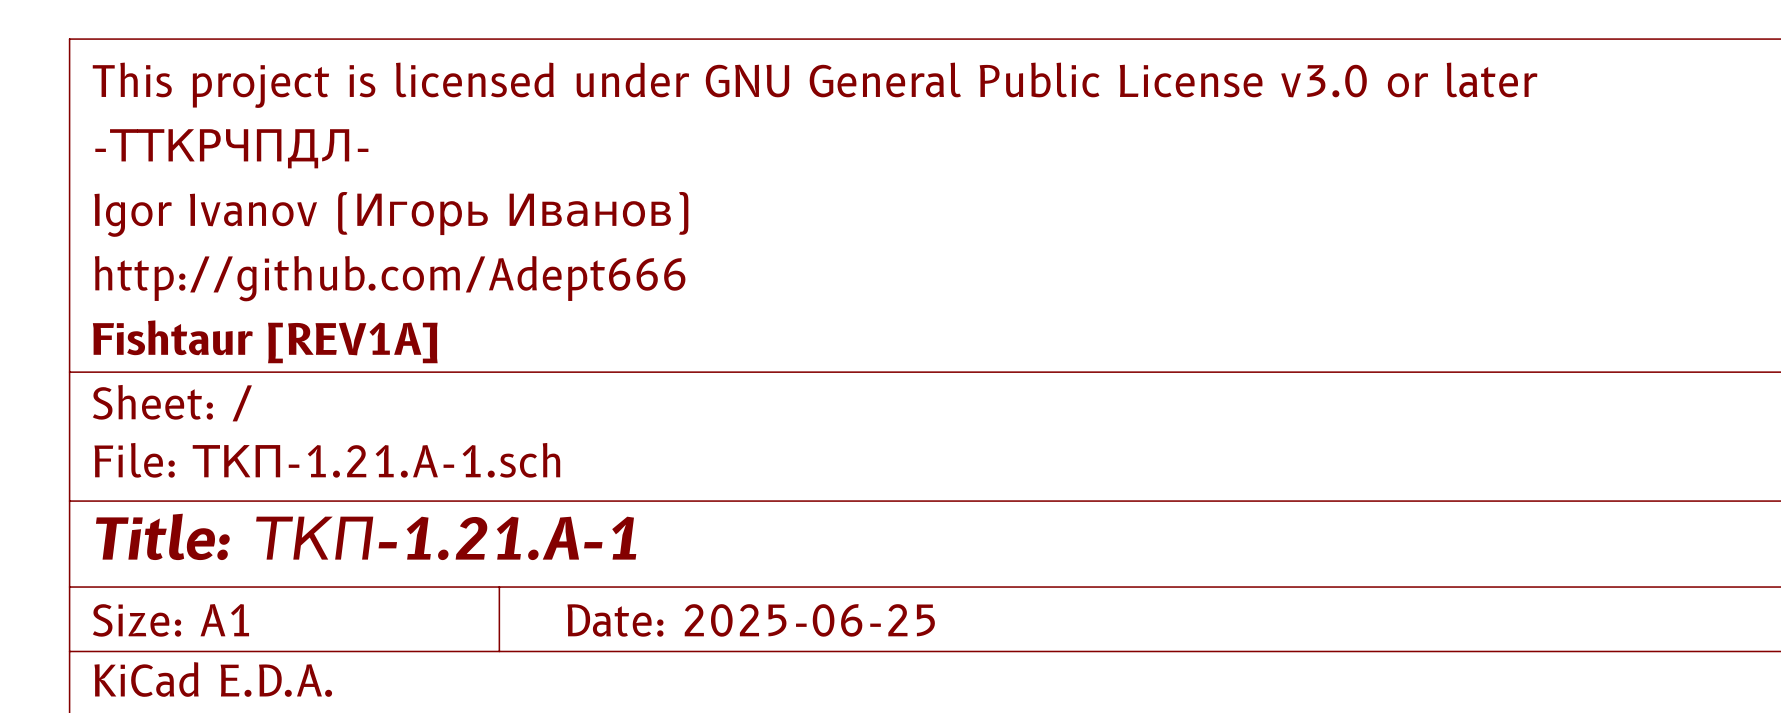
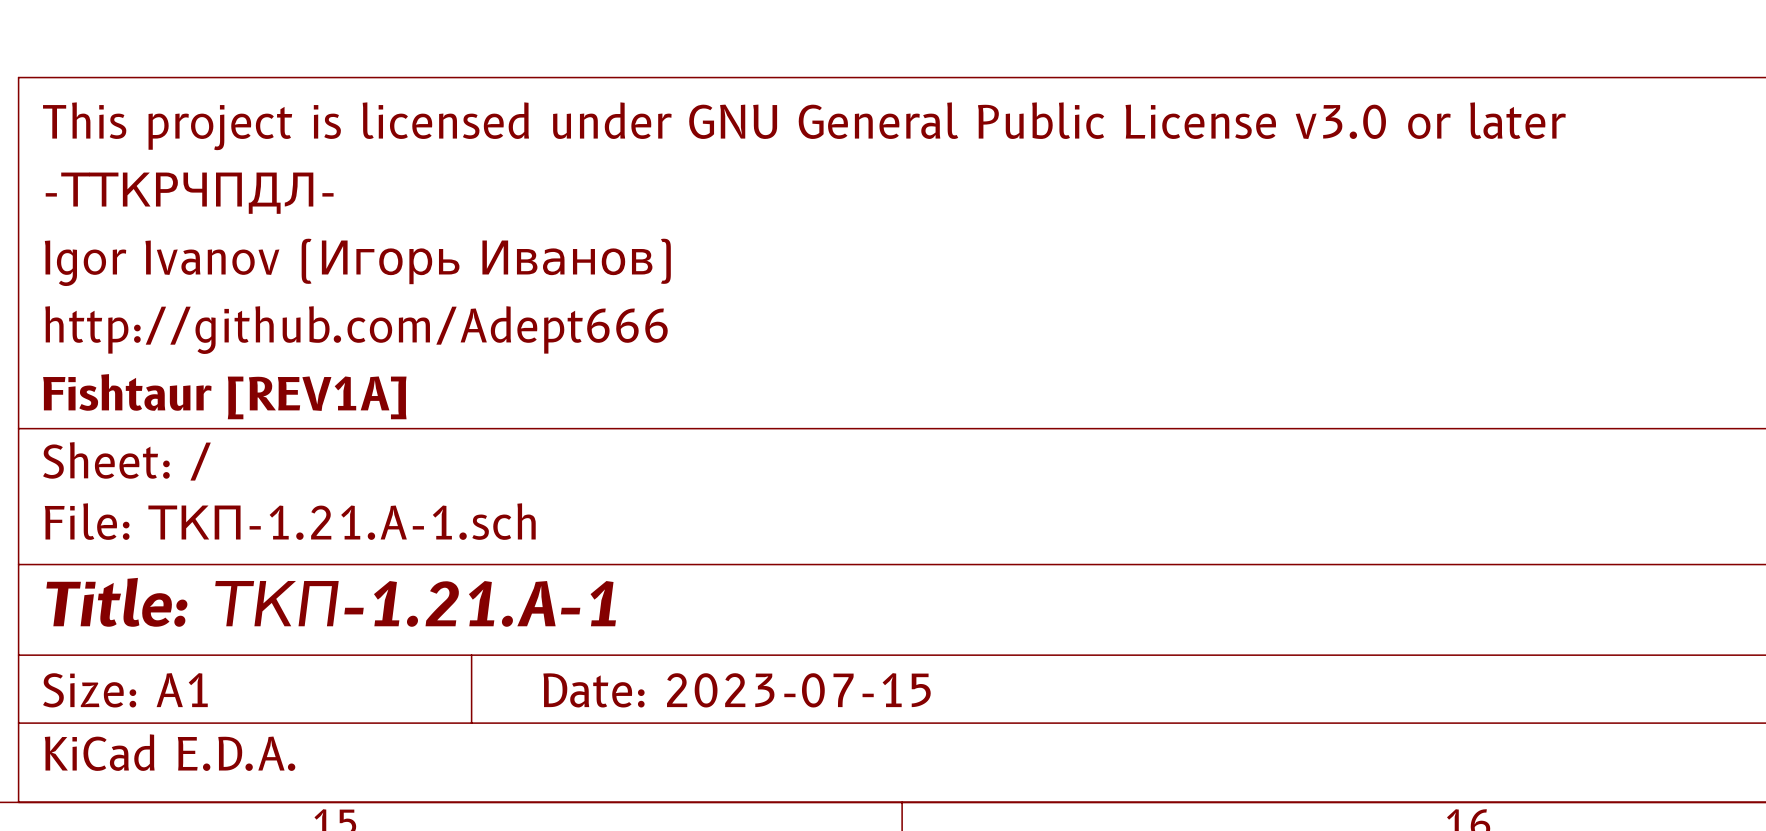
title block: Date: 2025-06-25 (751, 620) -> Date: 2023-07-15 (737, 690)

